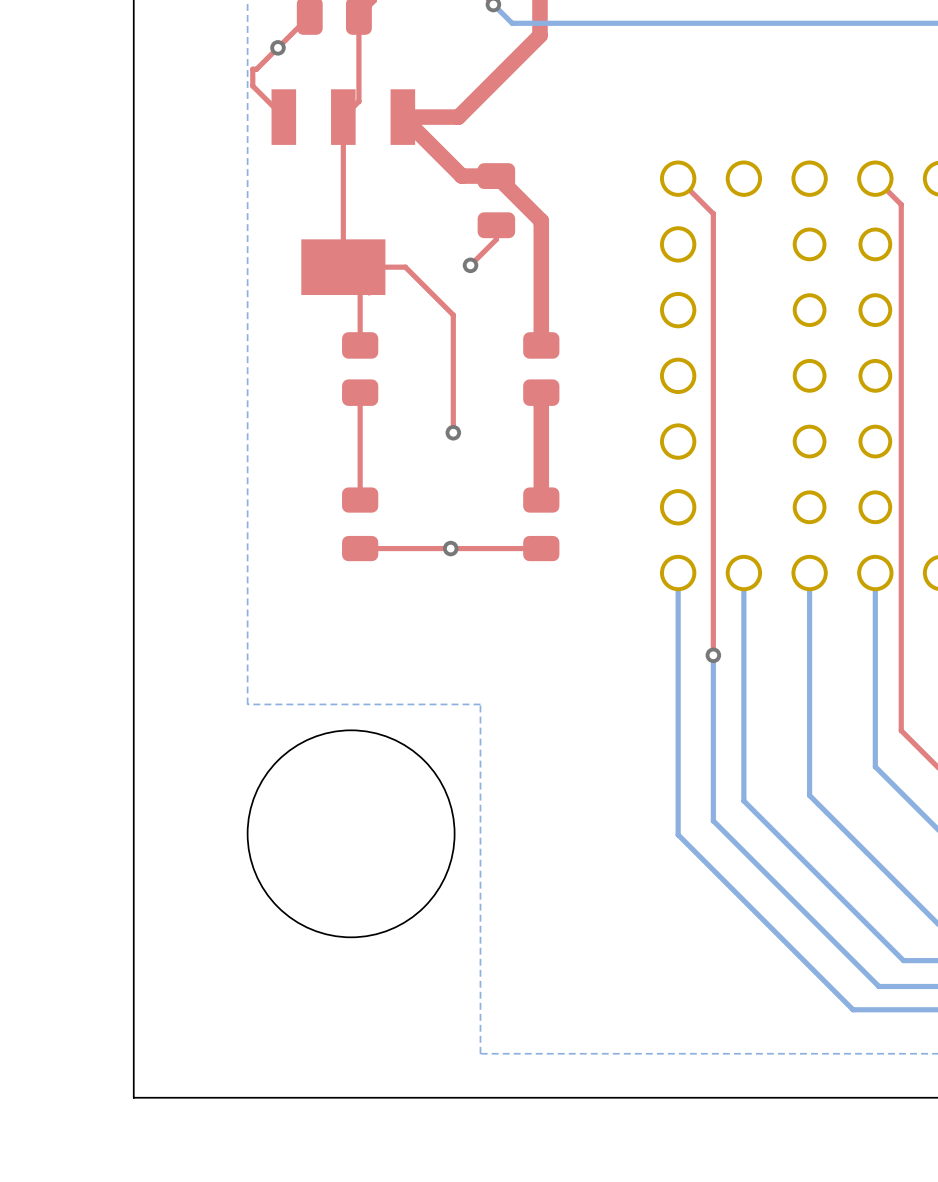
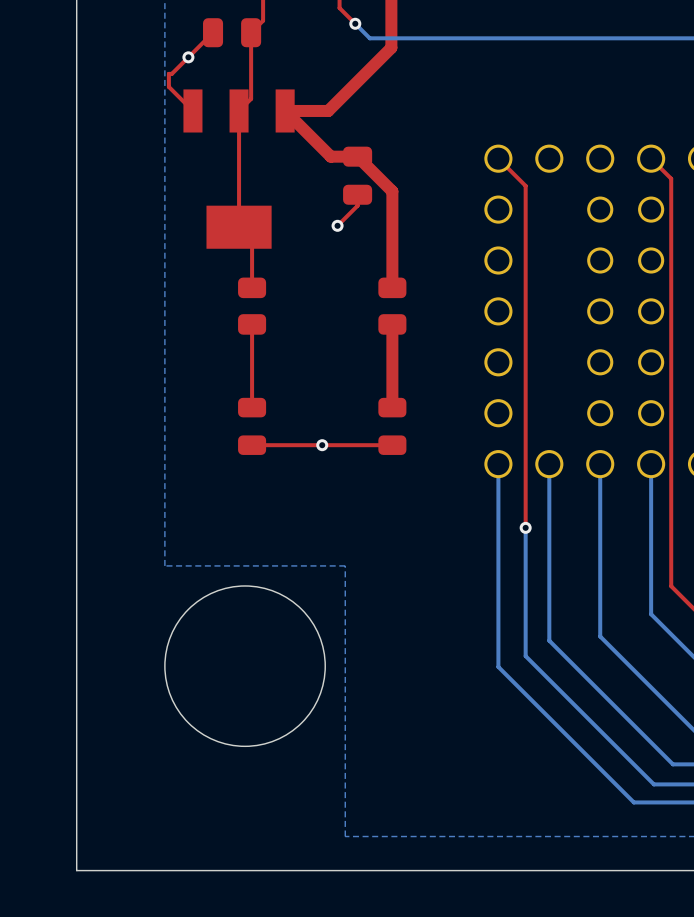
top track: (369, 293) (343, 267) (405, 267) (453, 315) (453, 432) -> none
via: (453, 432) -> none

